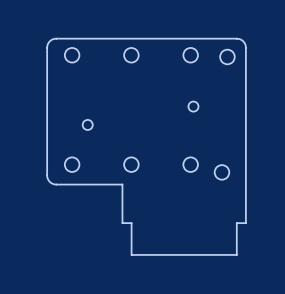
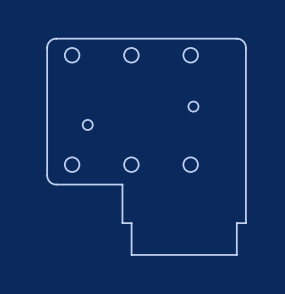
round board edge: [219, 49, 235, 65] -> none
round board edge: [214, 164, 230, 180] -> none

